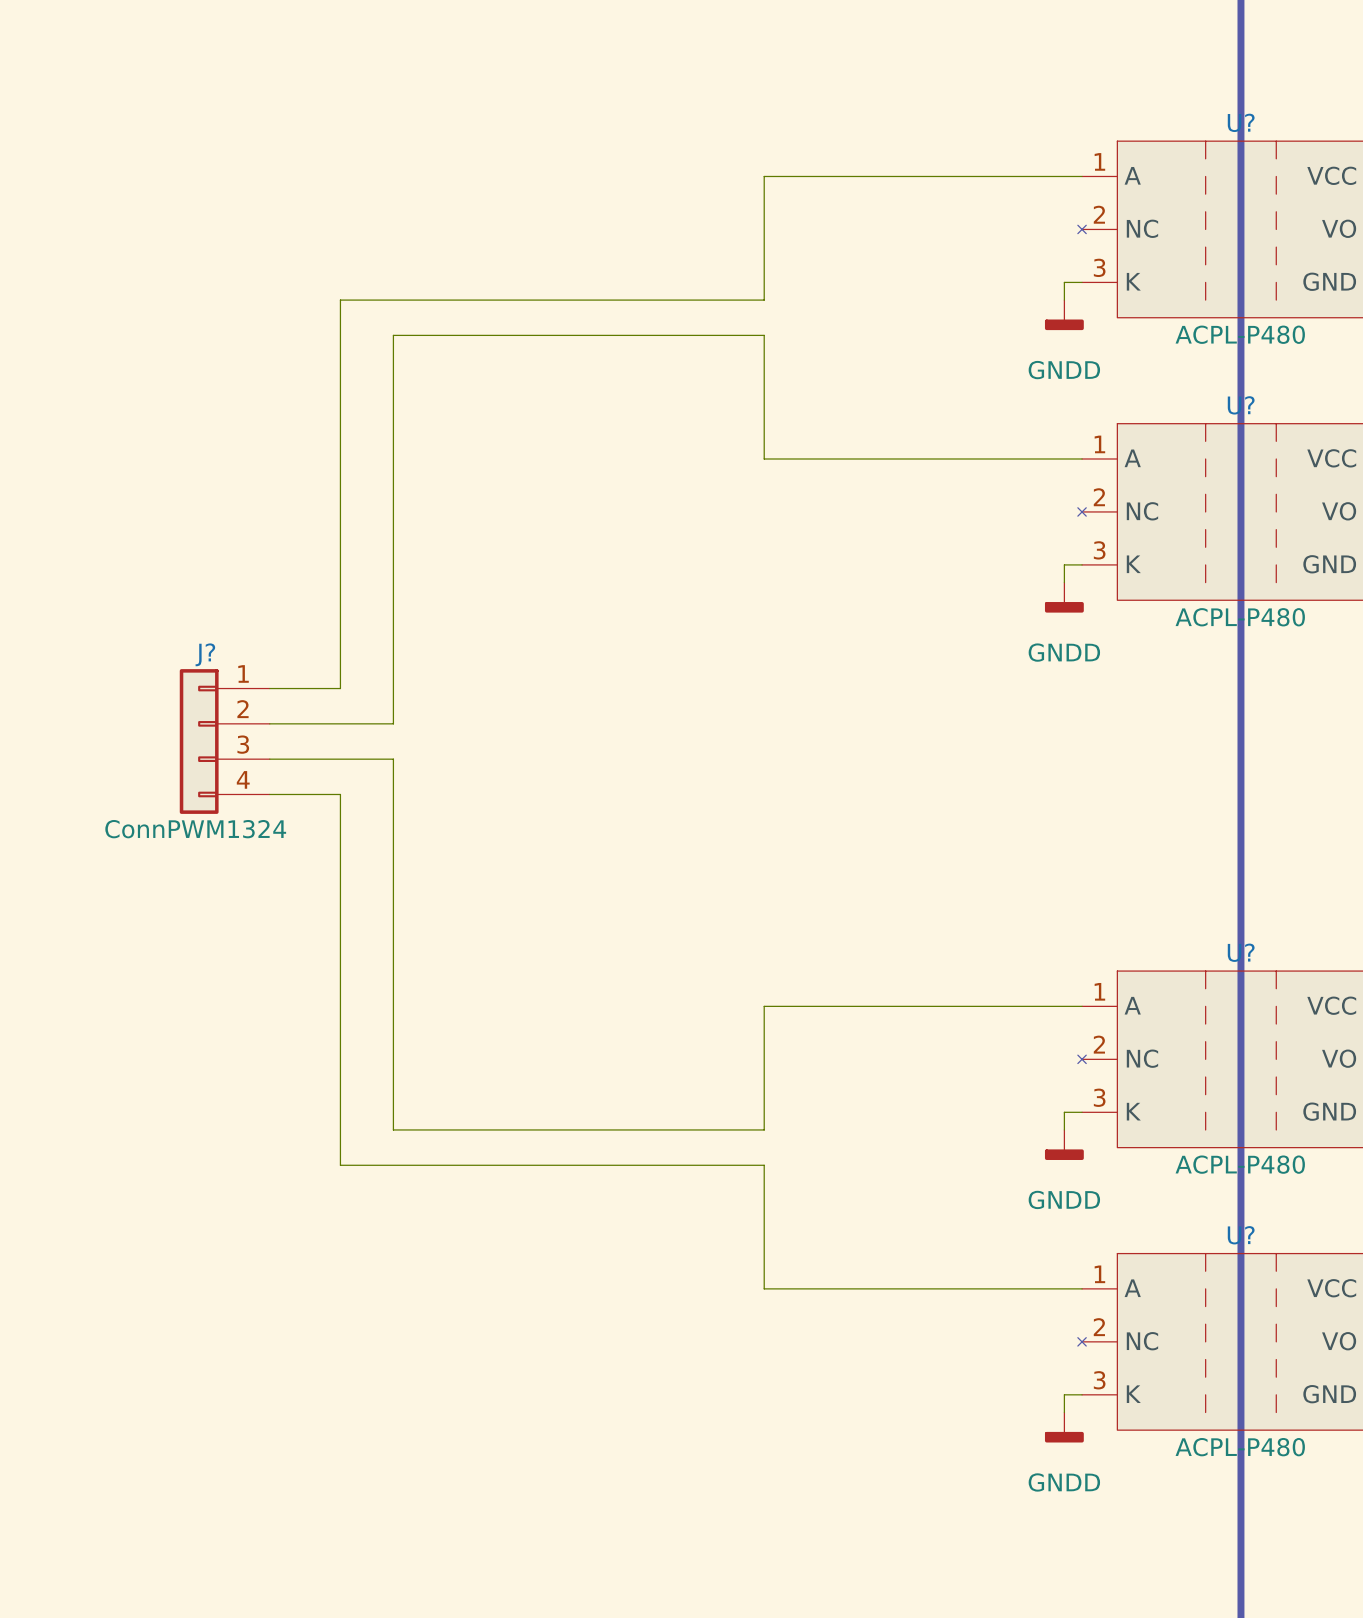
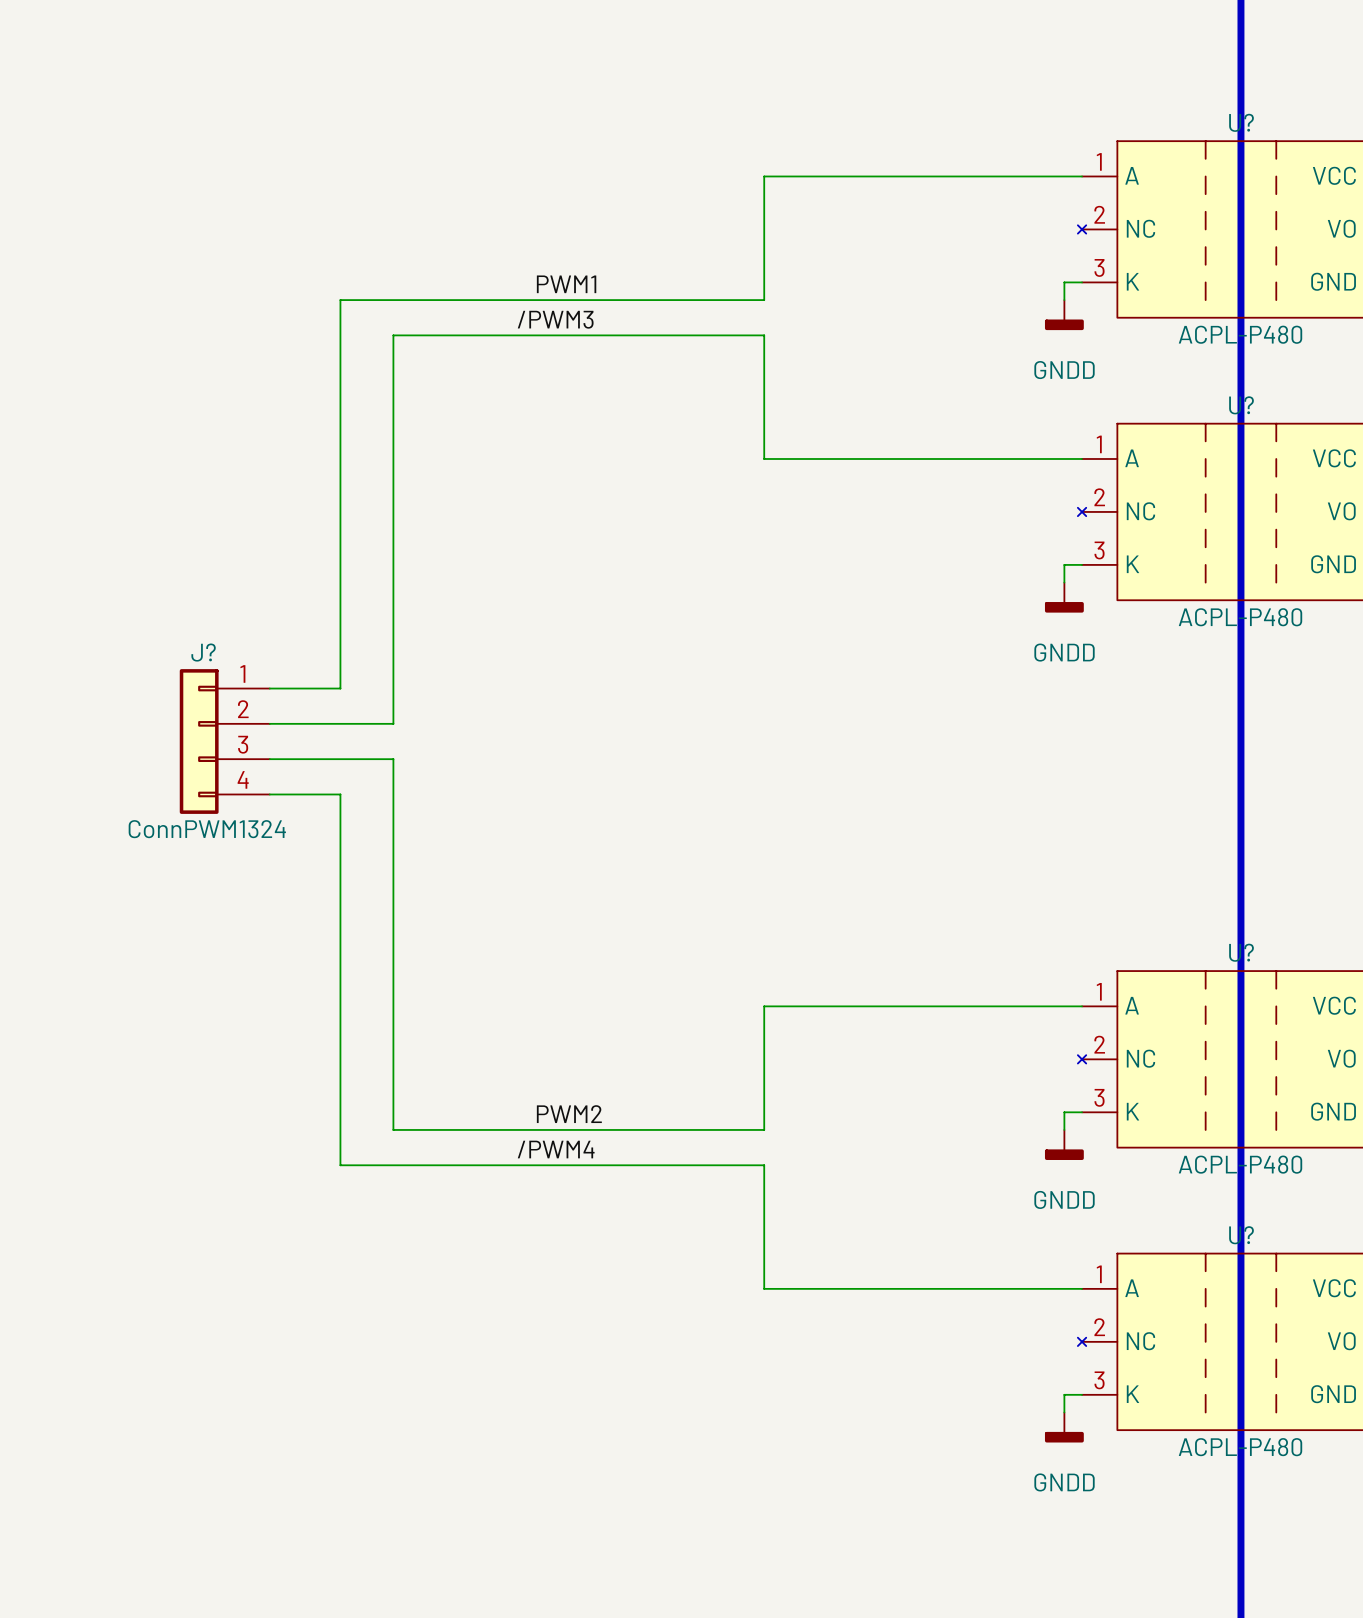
label: none -> PWM1 (566, 284)
label: none -> /PWM3 (555, 319)
label: none -> PWM2 (569, 1114)
label: none -> /PWM4 (556, 1149)

